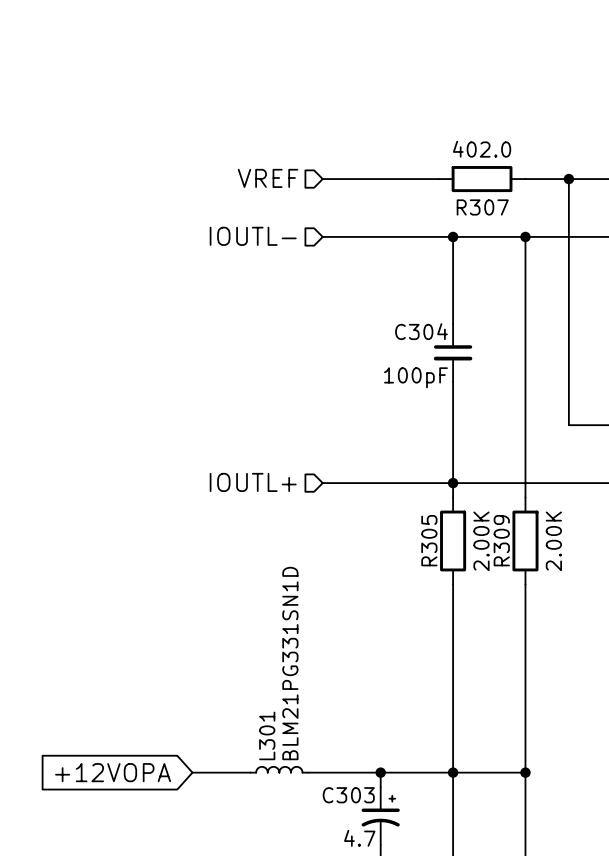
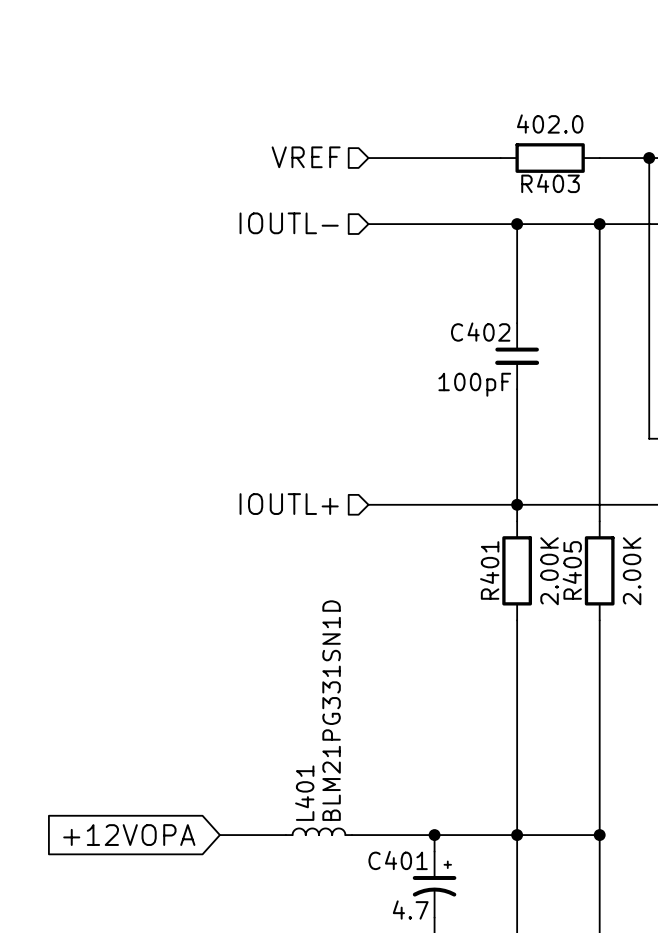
R307 name: R307 (482, 207) -> R403 (550, 183)
C304 name: C304 (421, 331) -> C402 (480, 332)
R305 name: R305 (429, 540) -> R401 (489, 570)
R309 name: R309 (501, 540) -> R405 (572, 570)
L301 name: L301 (267, 735) -> L401 (304, 793)
C303 name: C303 (348, 795) -> C401 (398, 860)

